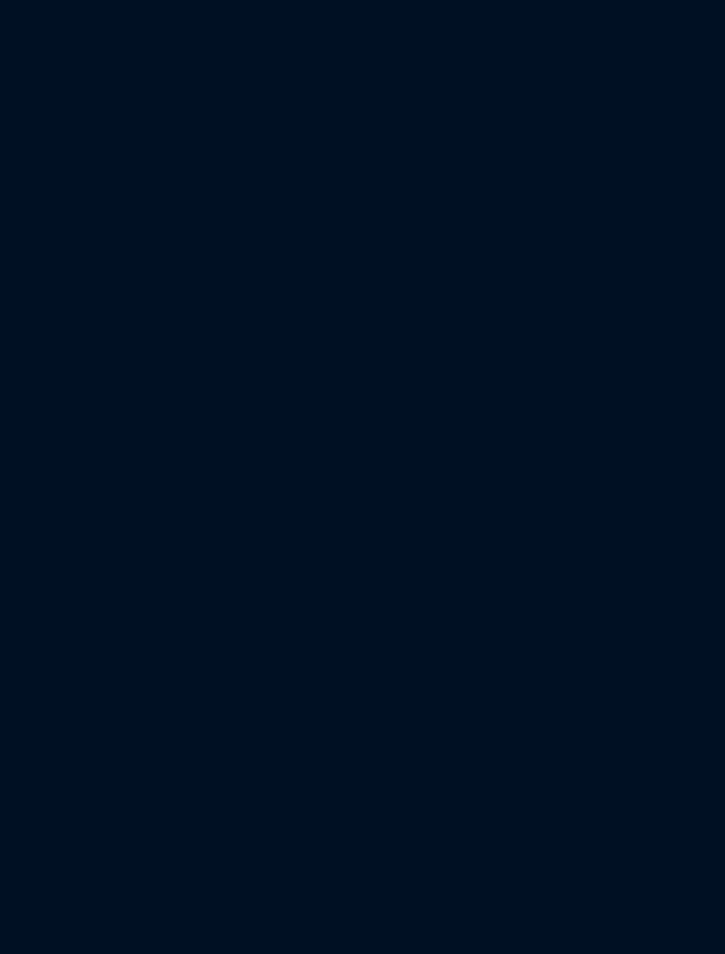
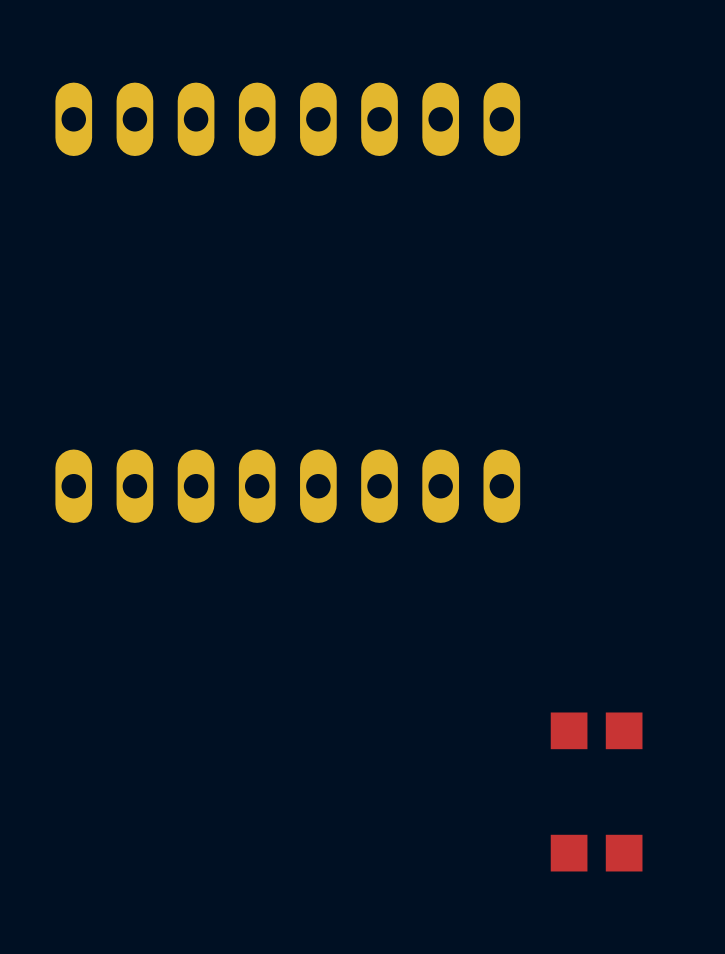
part: none -> (287, 119)
part: none -> (287, 486)
part: none -> (596, 730)
part: none -> (596, 853)

